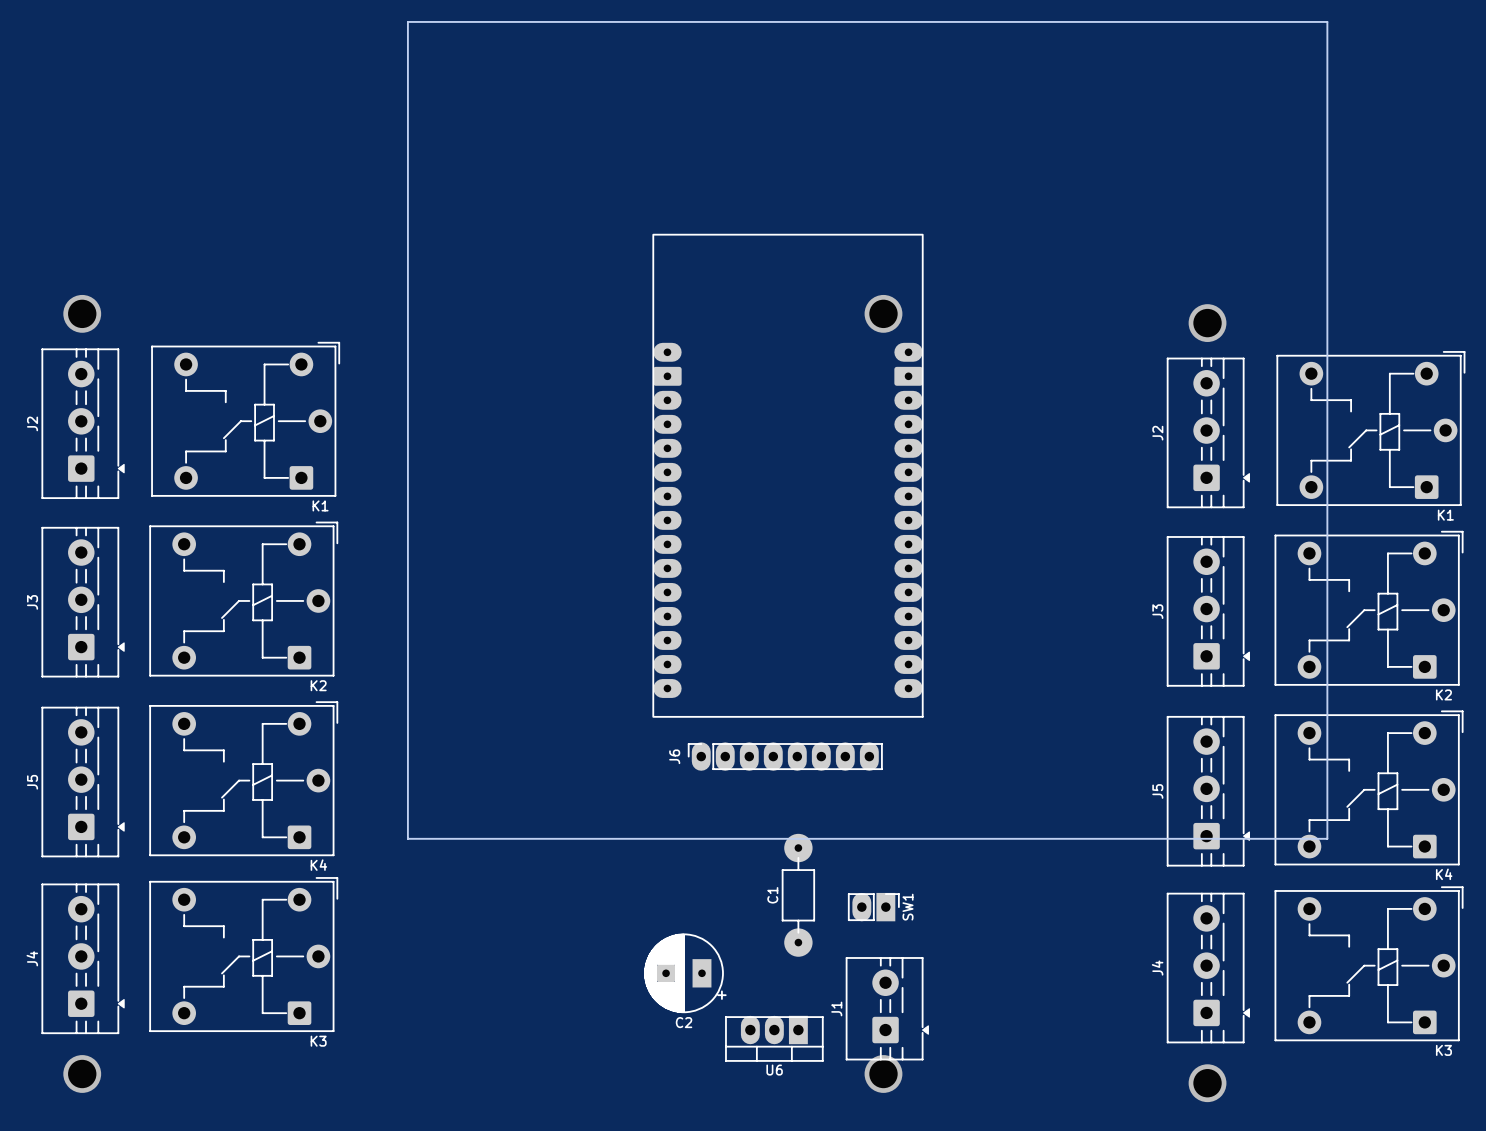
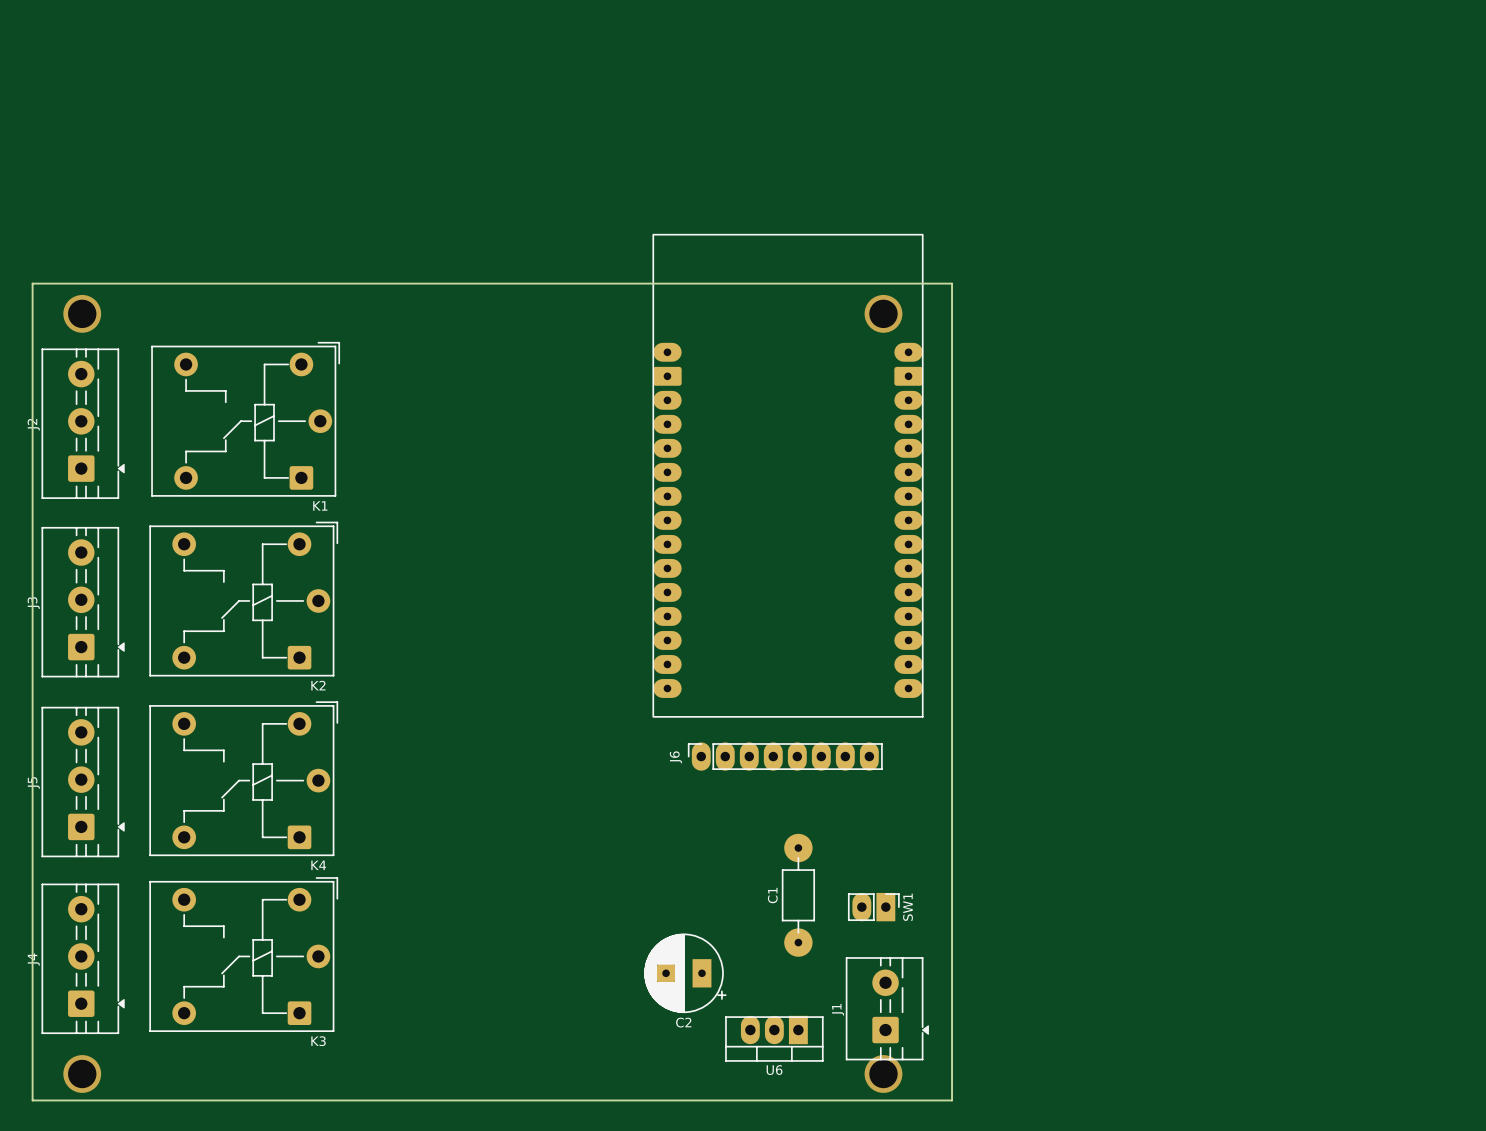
board edge: (407, 21) (1327, 21) (1327, 838) (407, 838) (407, 21) -> none
board edge: none -> (32, 283) (952, 283) (952, 1100) (32, 1100) (32, 283)
via: (1207, 323) -> none
K1: (1370, 428) -> none
J2: (1208, 432) -> none
K2: (1369, 608) -> none
J3: (1208, 611) -> none
K4: (1369, 787) -> none
J5: (1208, 791) -> none
K3: (1369, 963) -> none
J4: (1208, 968) -> none
via: (1207, 1083) -> none

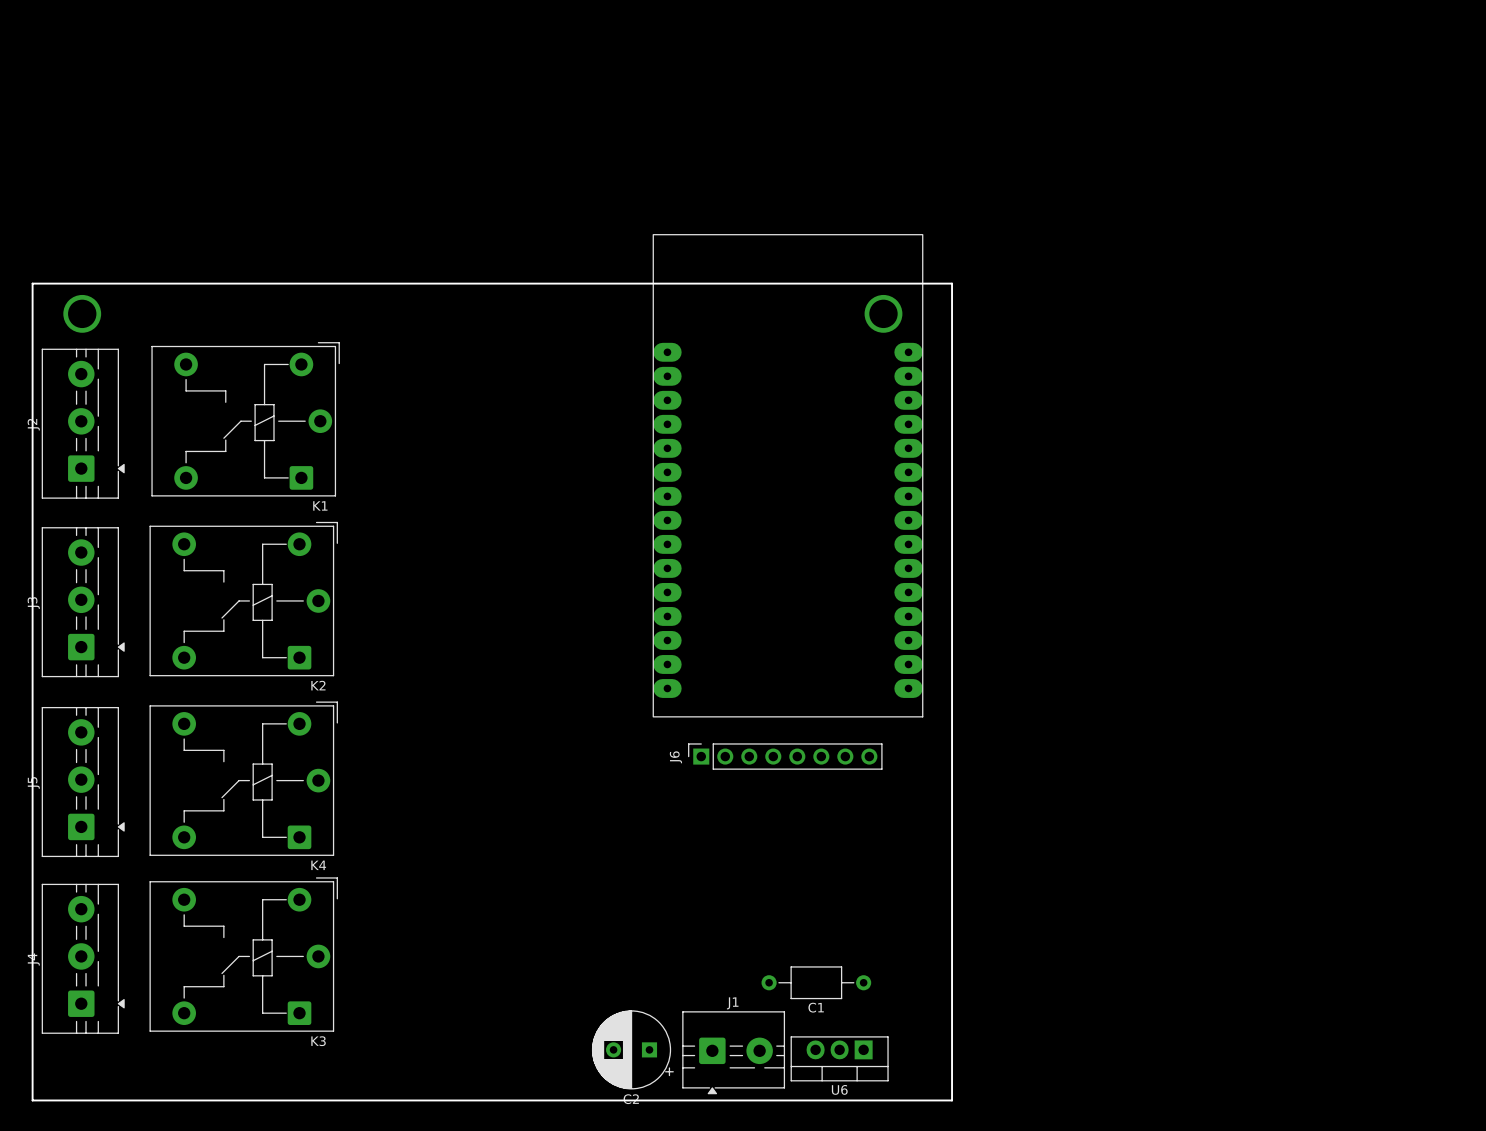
part footprint: [652, 234, 924, 718] -> [652, 234, 924, 718]
J6 footprint: [688, 742, 883, 771] -> [688, 743, 883, 770]
C1 footprint: [782, 833, 815, 957] -> [761, 966, 872, 1000]
C1 name position: C1 (772, 895) -> C1 (816, 1007)
SW1: (873, 907) -> none
C2 footprint: [644, 933, 727, 1013] -> [592, 1010, 674, 1090]
J1 rotation: 0° (887, 1008) -> 90° clockwise (733, 1052)
J1 position: (887, 1008) -> (733, 1052)
U6 footprint: [725, 1015, 824, 1062] -> [790, 1036, 889, 1082]
via: (82, 1073) -> none
via: (883, 1073) -> none

